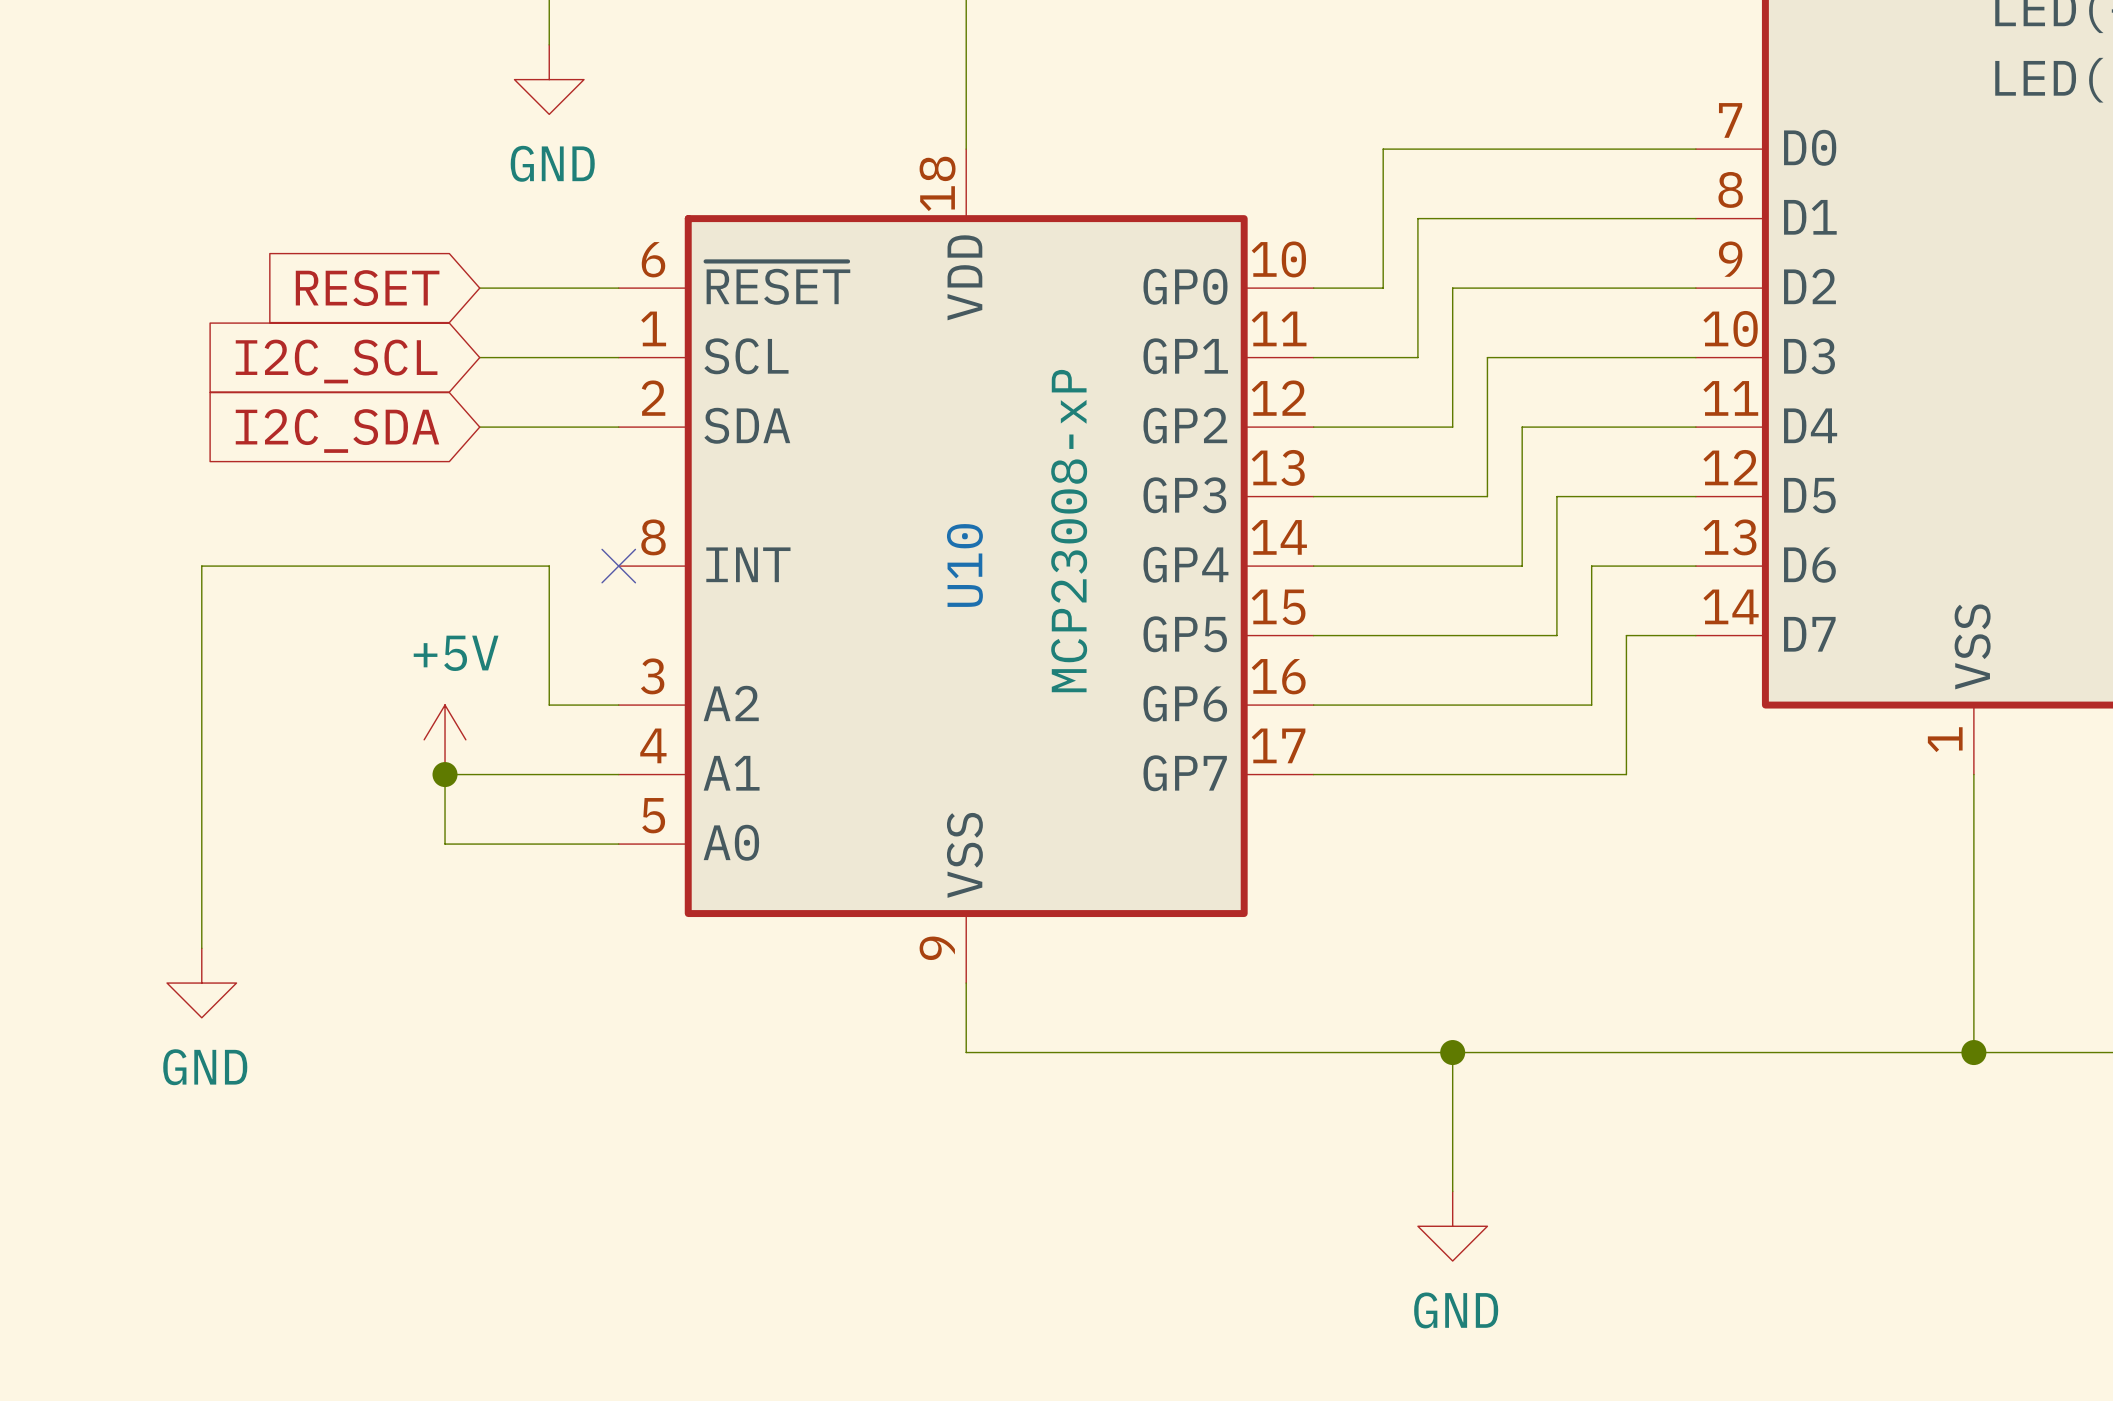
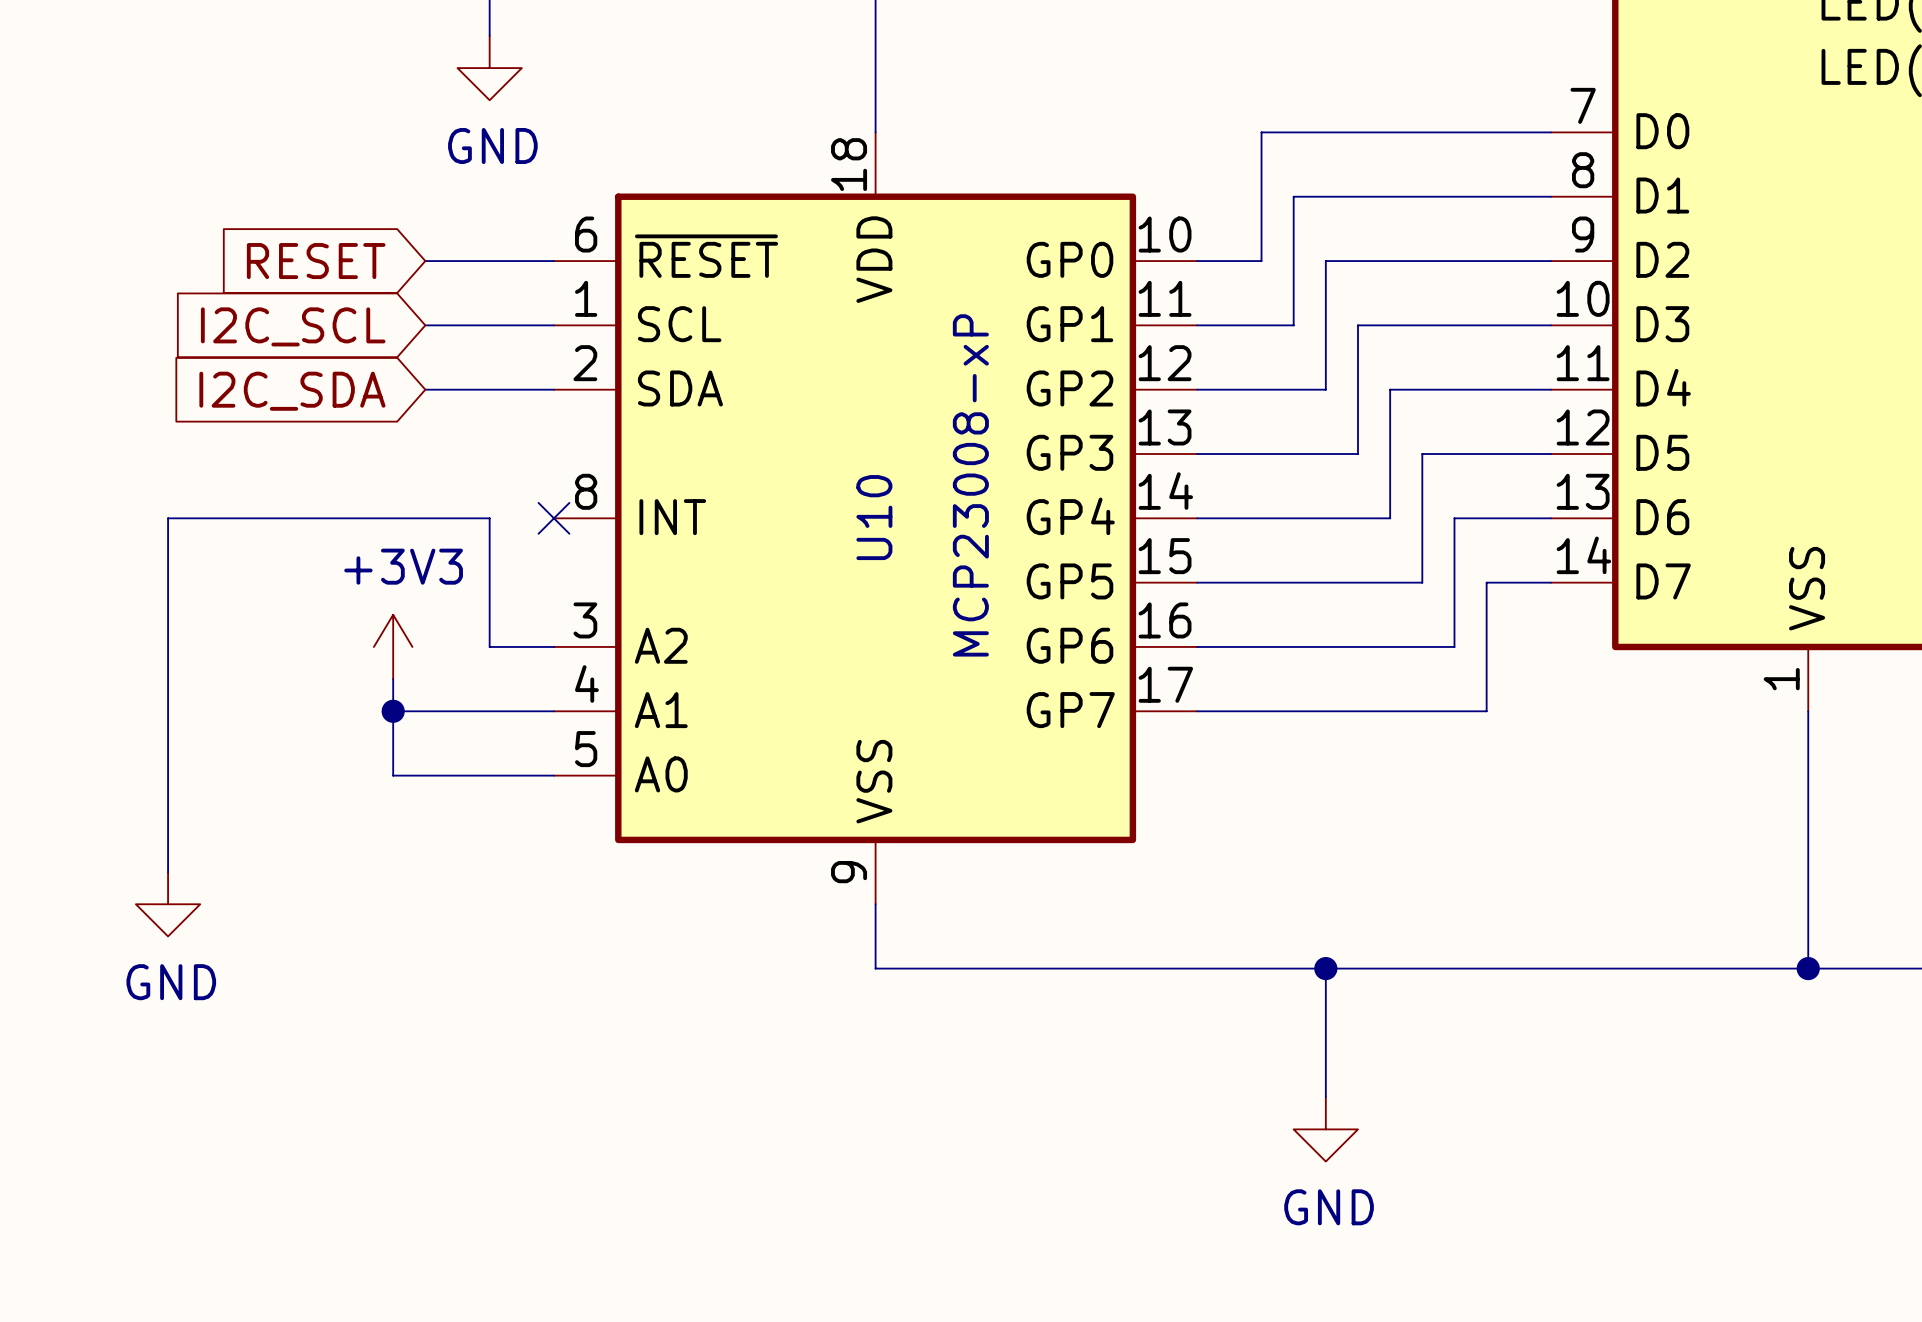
power symbol: none -> +3V3 (393, 646)
power symbol: +5V (445, 739) -> none

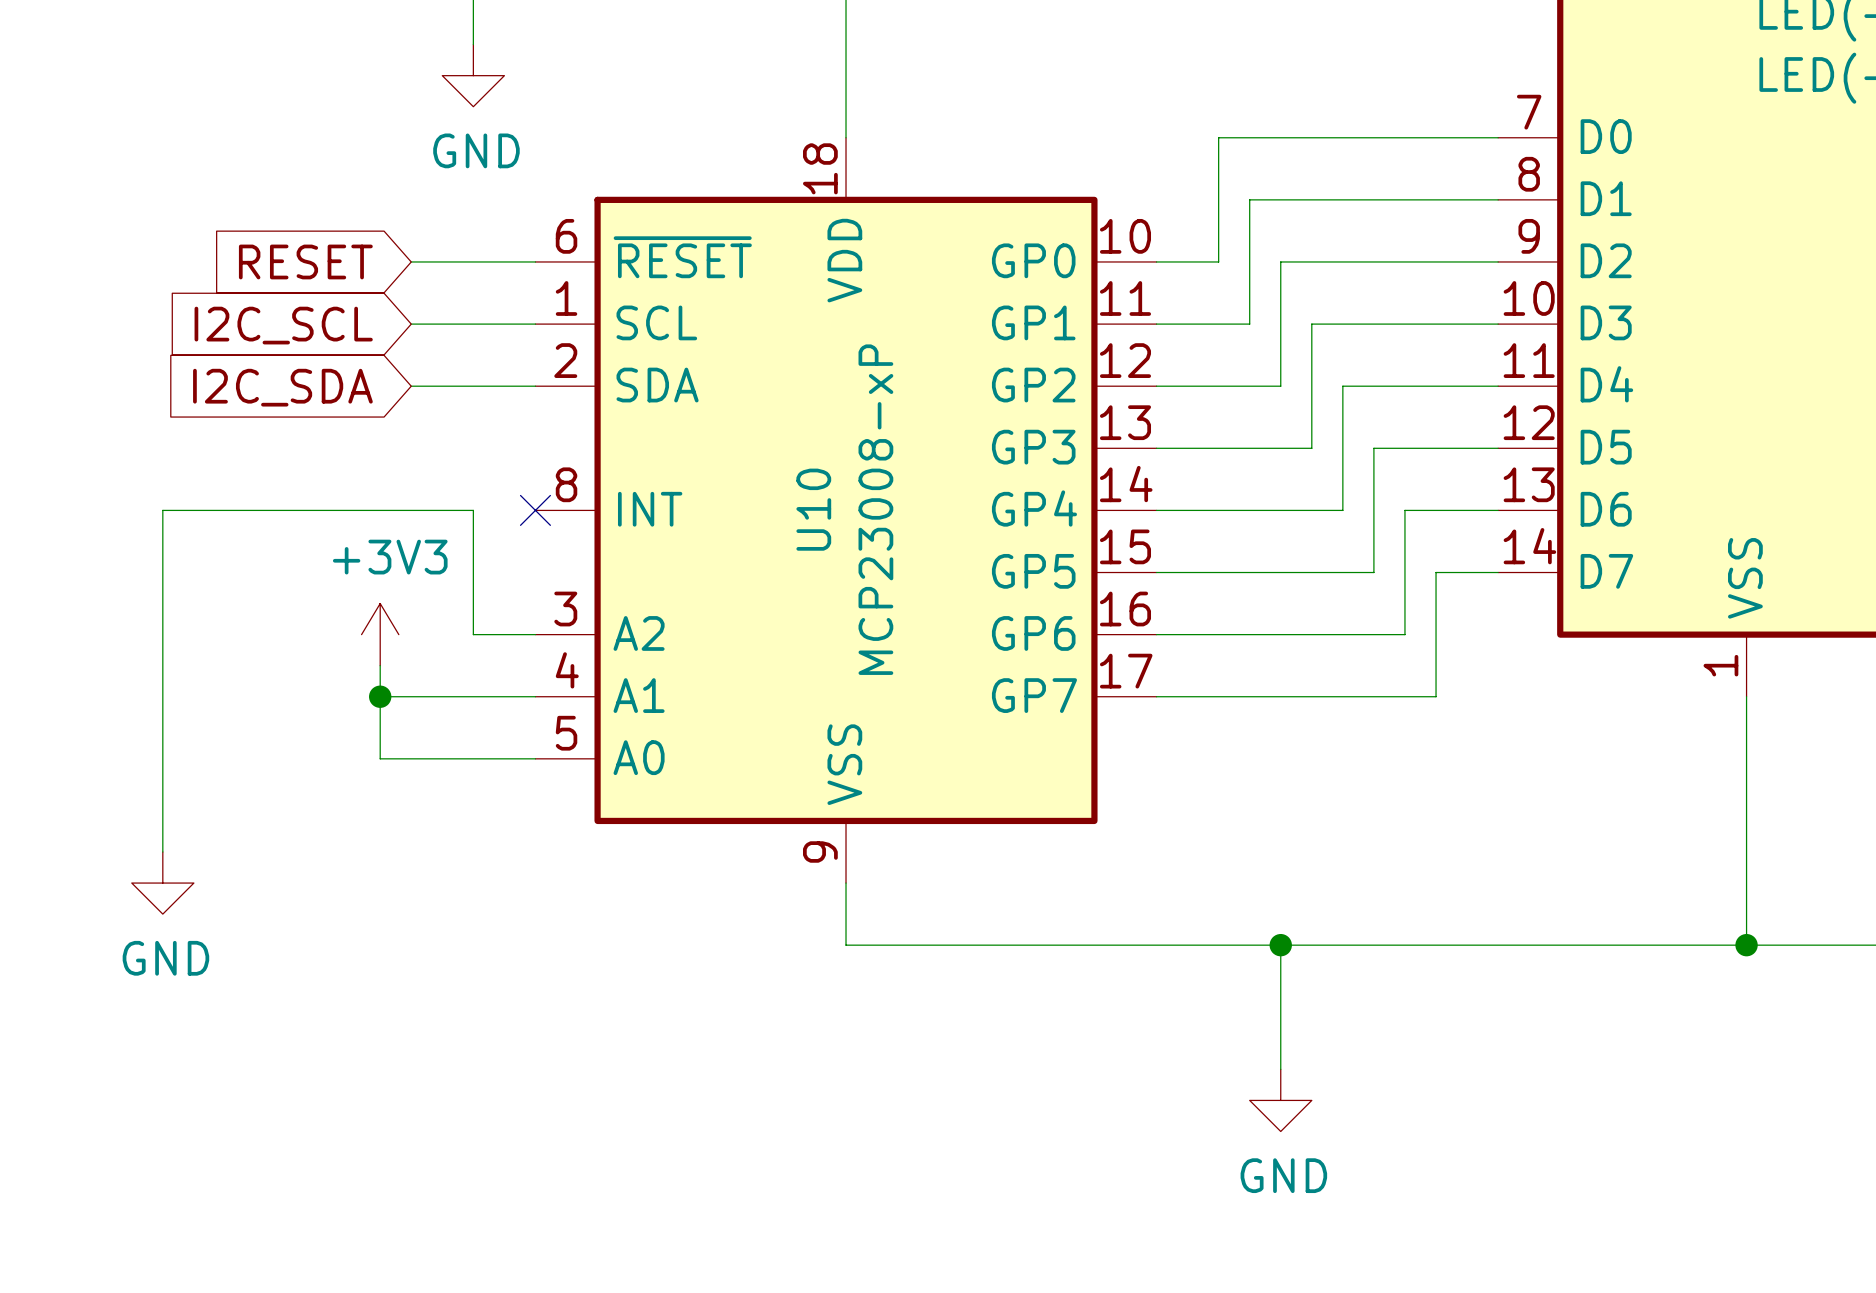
U10 value position: MCP23008-xP (970, 485) -> MCP23008-xP (875, 509)
U10 name position: U10 (874, 517) -> U10 (813, 509)

